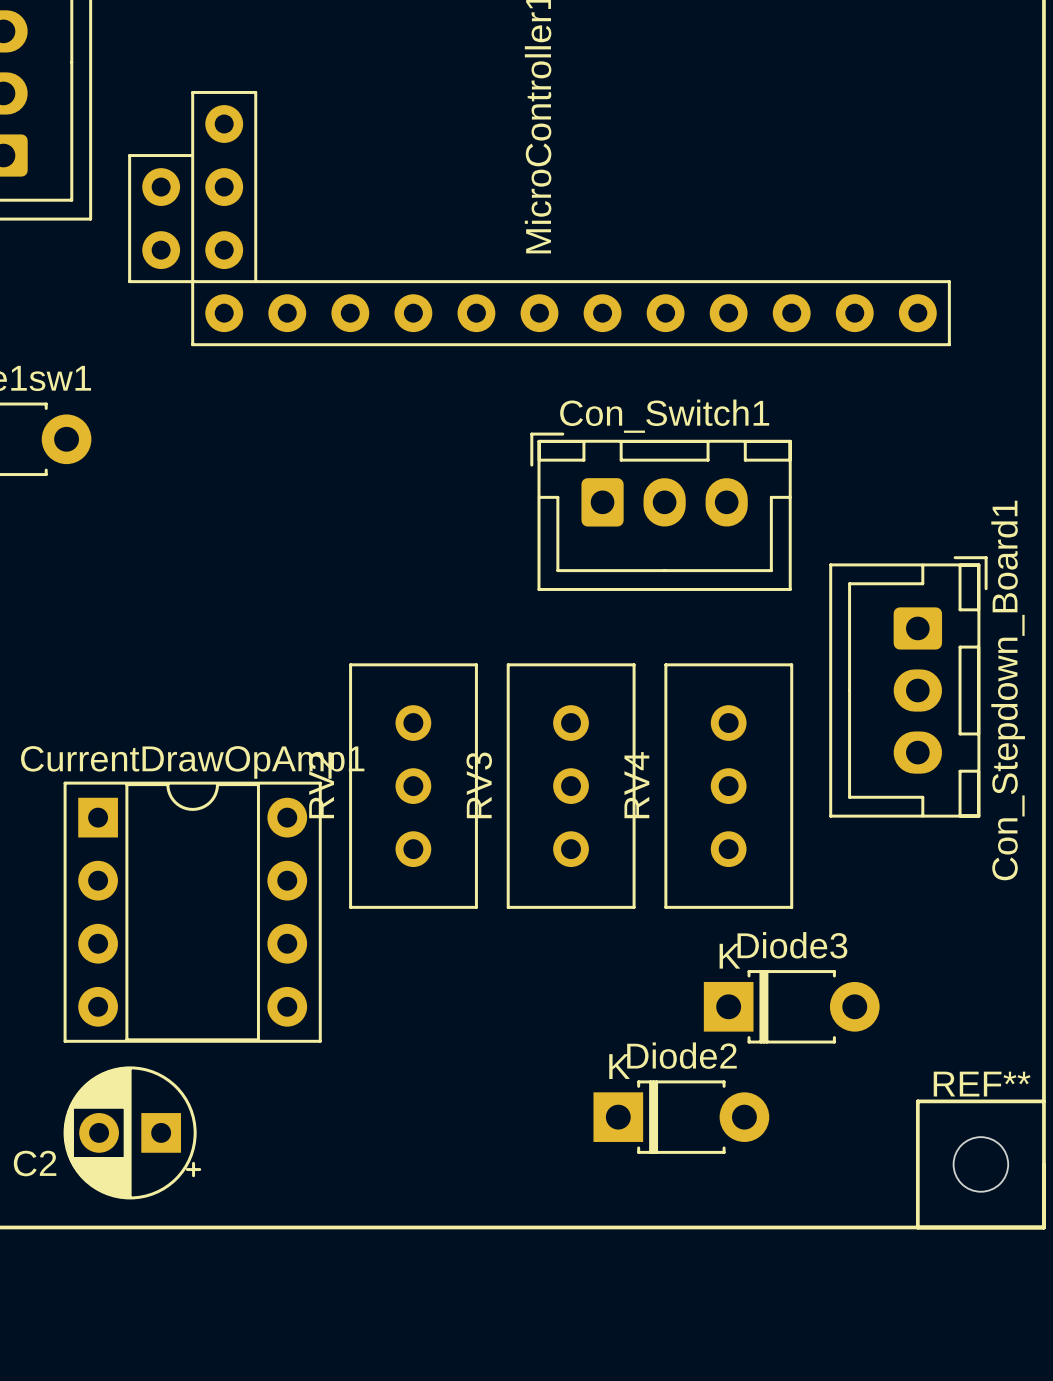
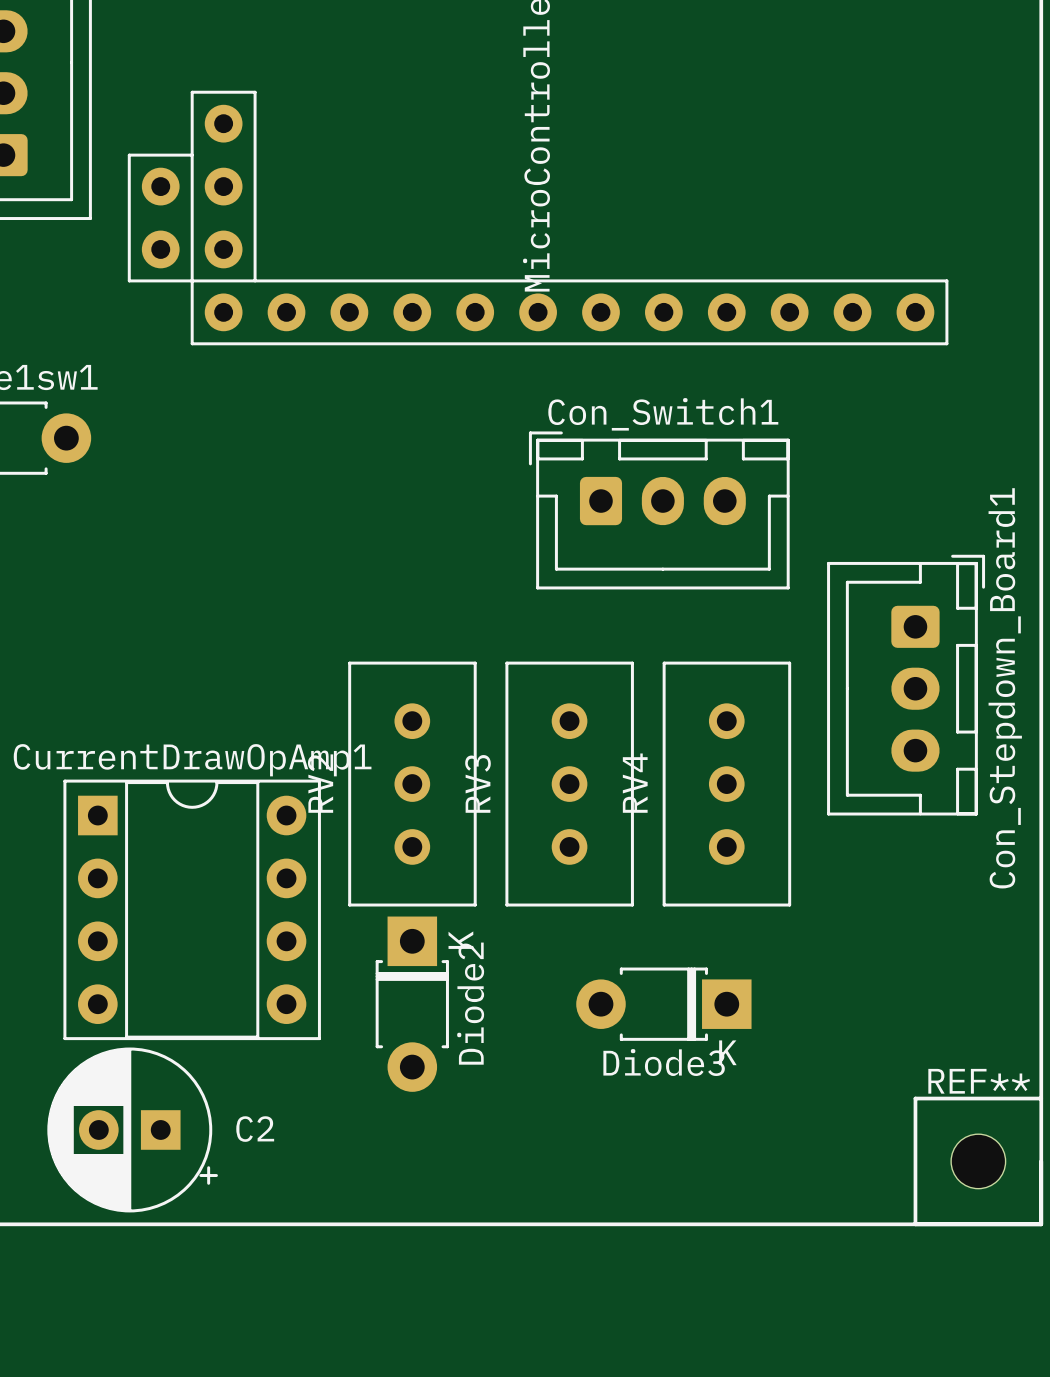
Diode3 rotation: 0° (791, 1006) -> 180° (663, 1004)
Diode3 position: (791, 1006) -> (663, 1004)
C2 footprint: [63, 1066, 202, 1200] -> [47, 1047, 218, 1213]
Diode2 rotation: 0° (681, 1117) -> 90° clockwise (412, 1004)
Diode2 position: (681, 1117) -> (412, 1004)
C2 name position: C2 (35, 1163) -> C2 (255, 1129)

